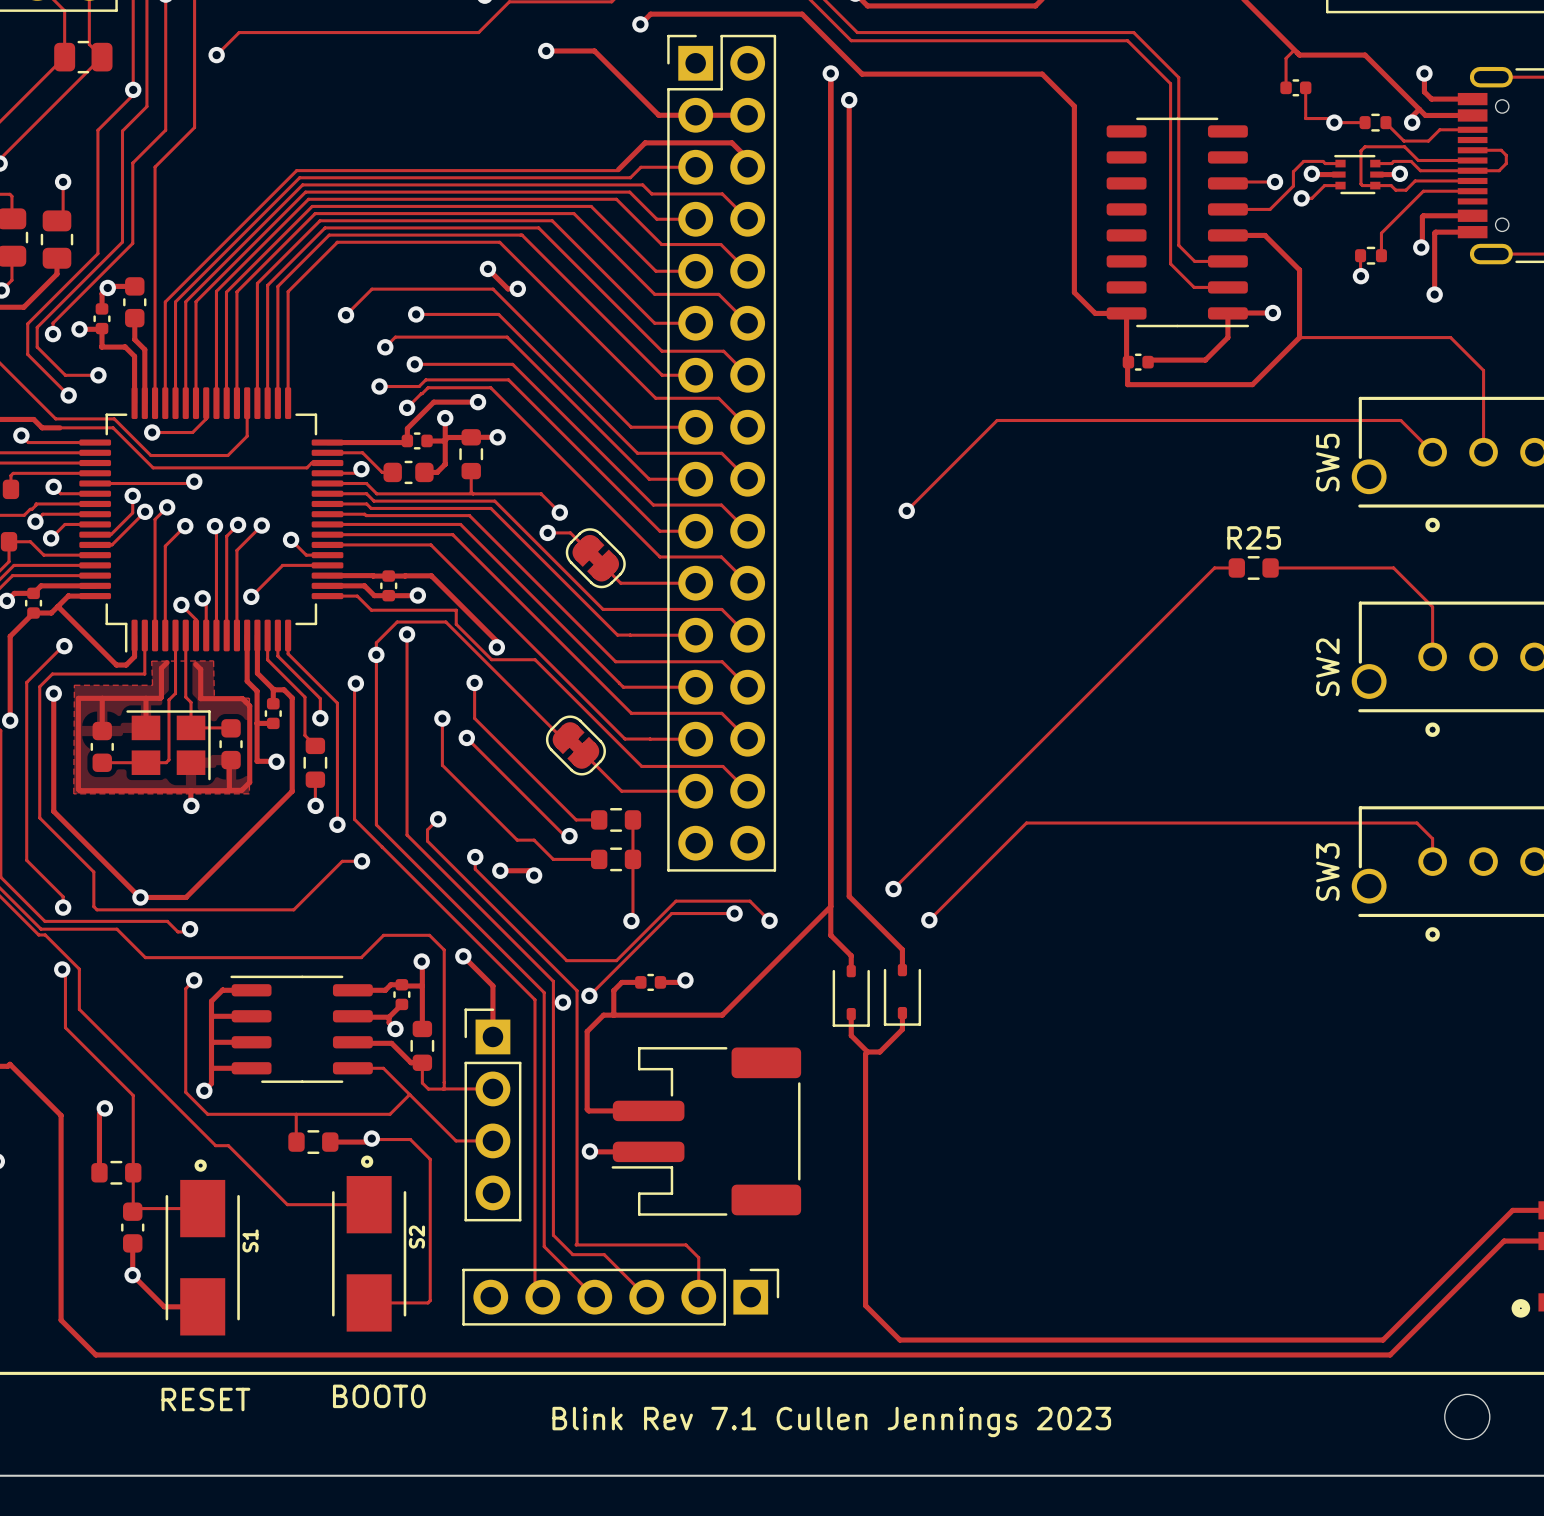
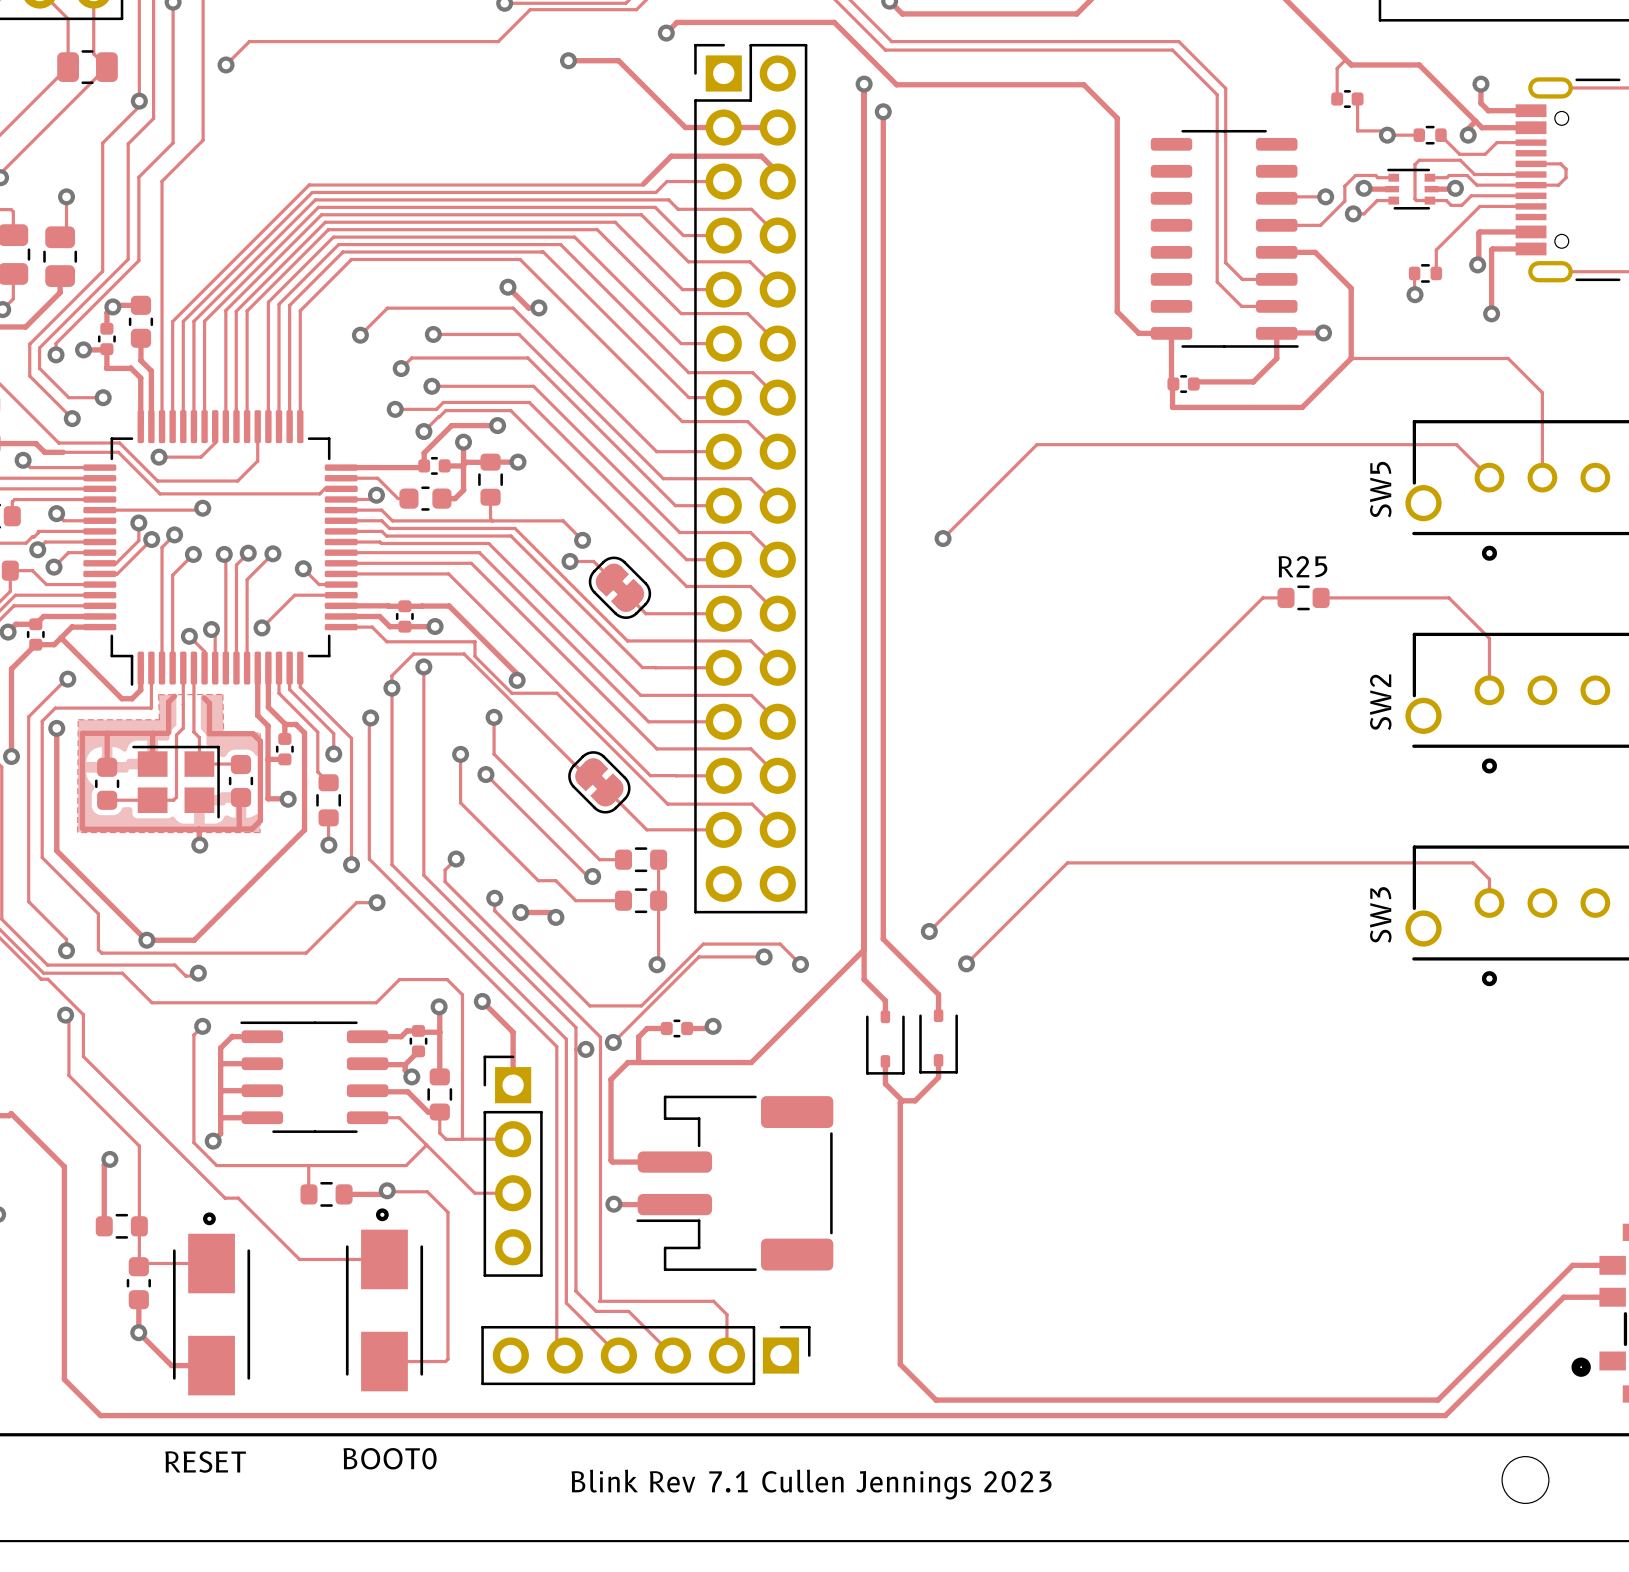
S2 name: S2 (416, 1237) -> none
S1 name: S1 (250, 1240) -> none

